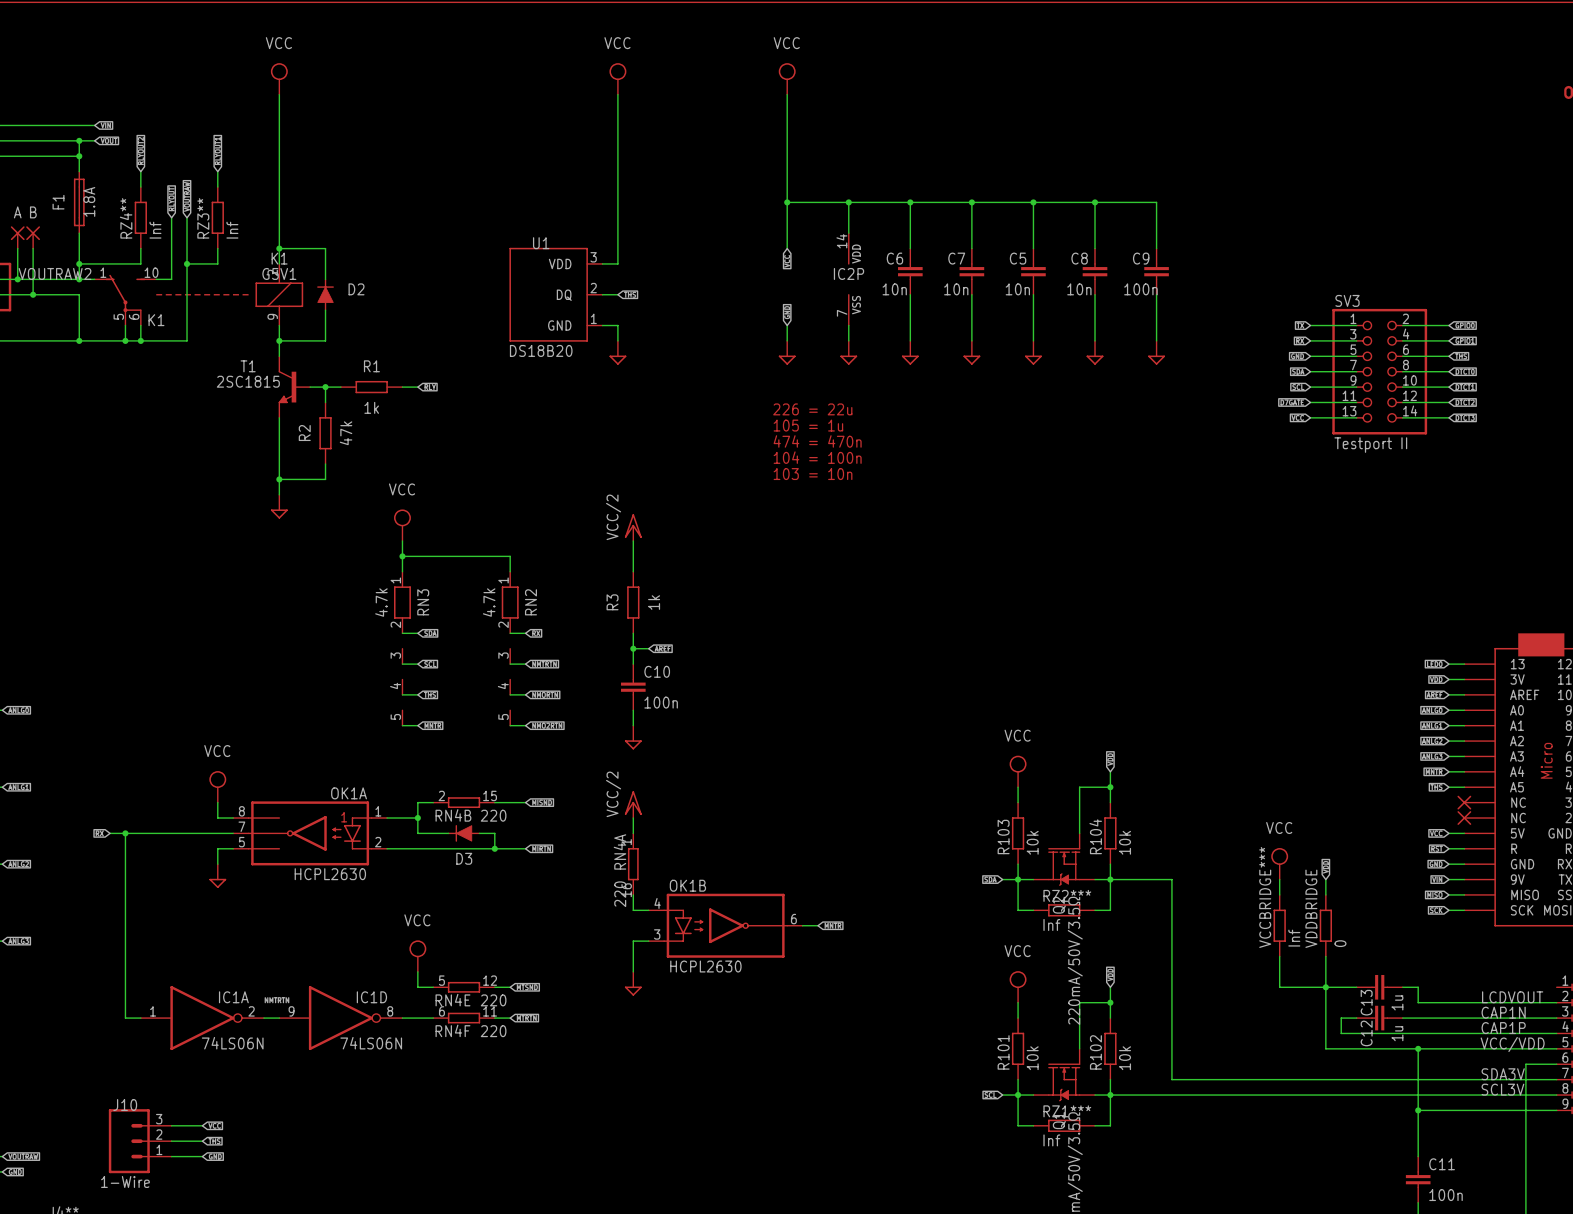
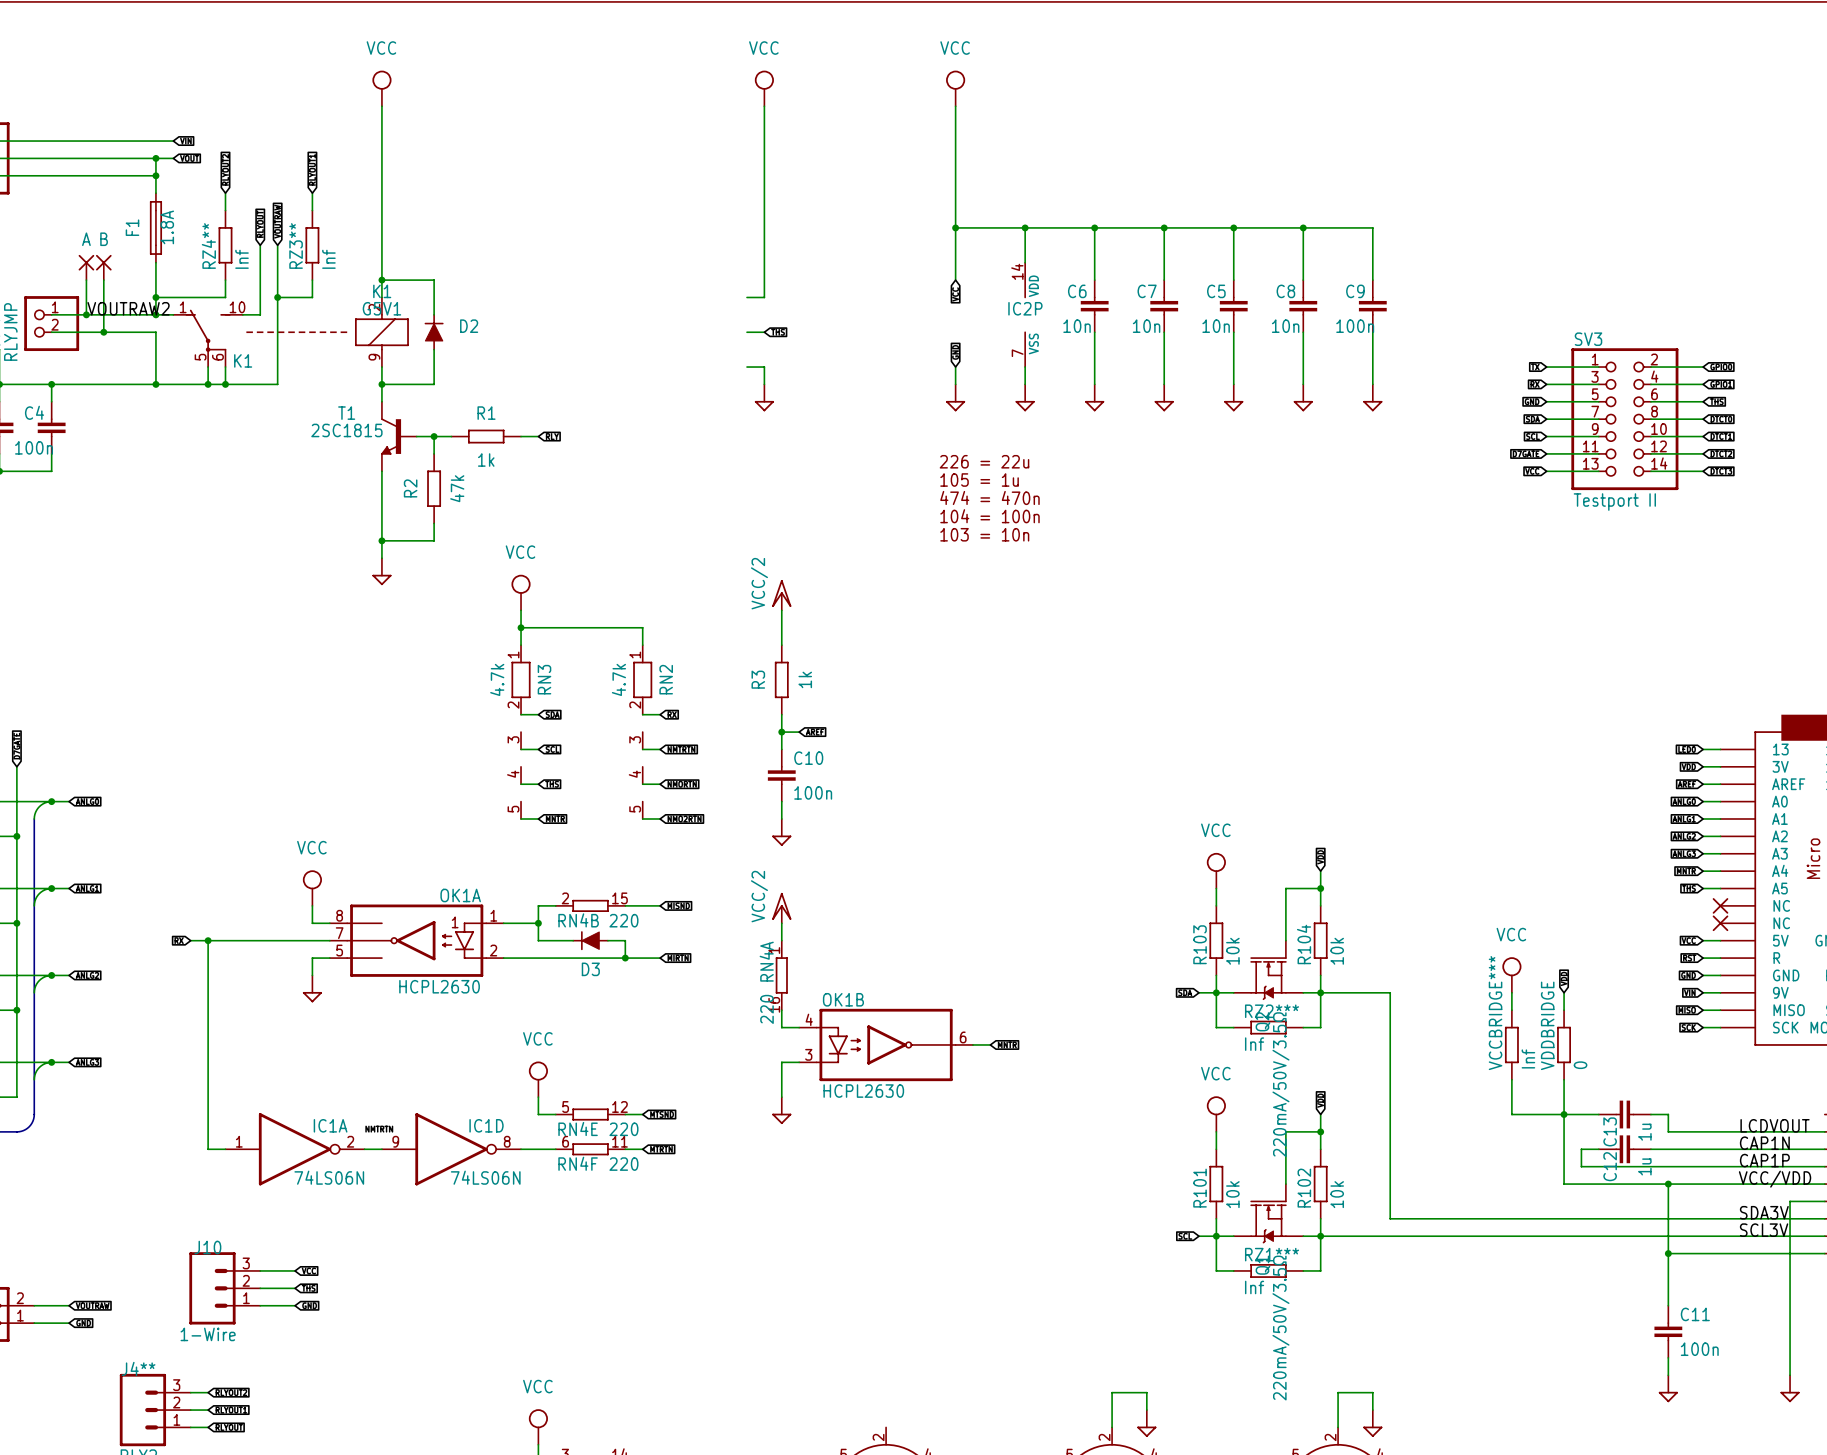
U1: DS18B20 (555, 294) -> none

